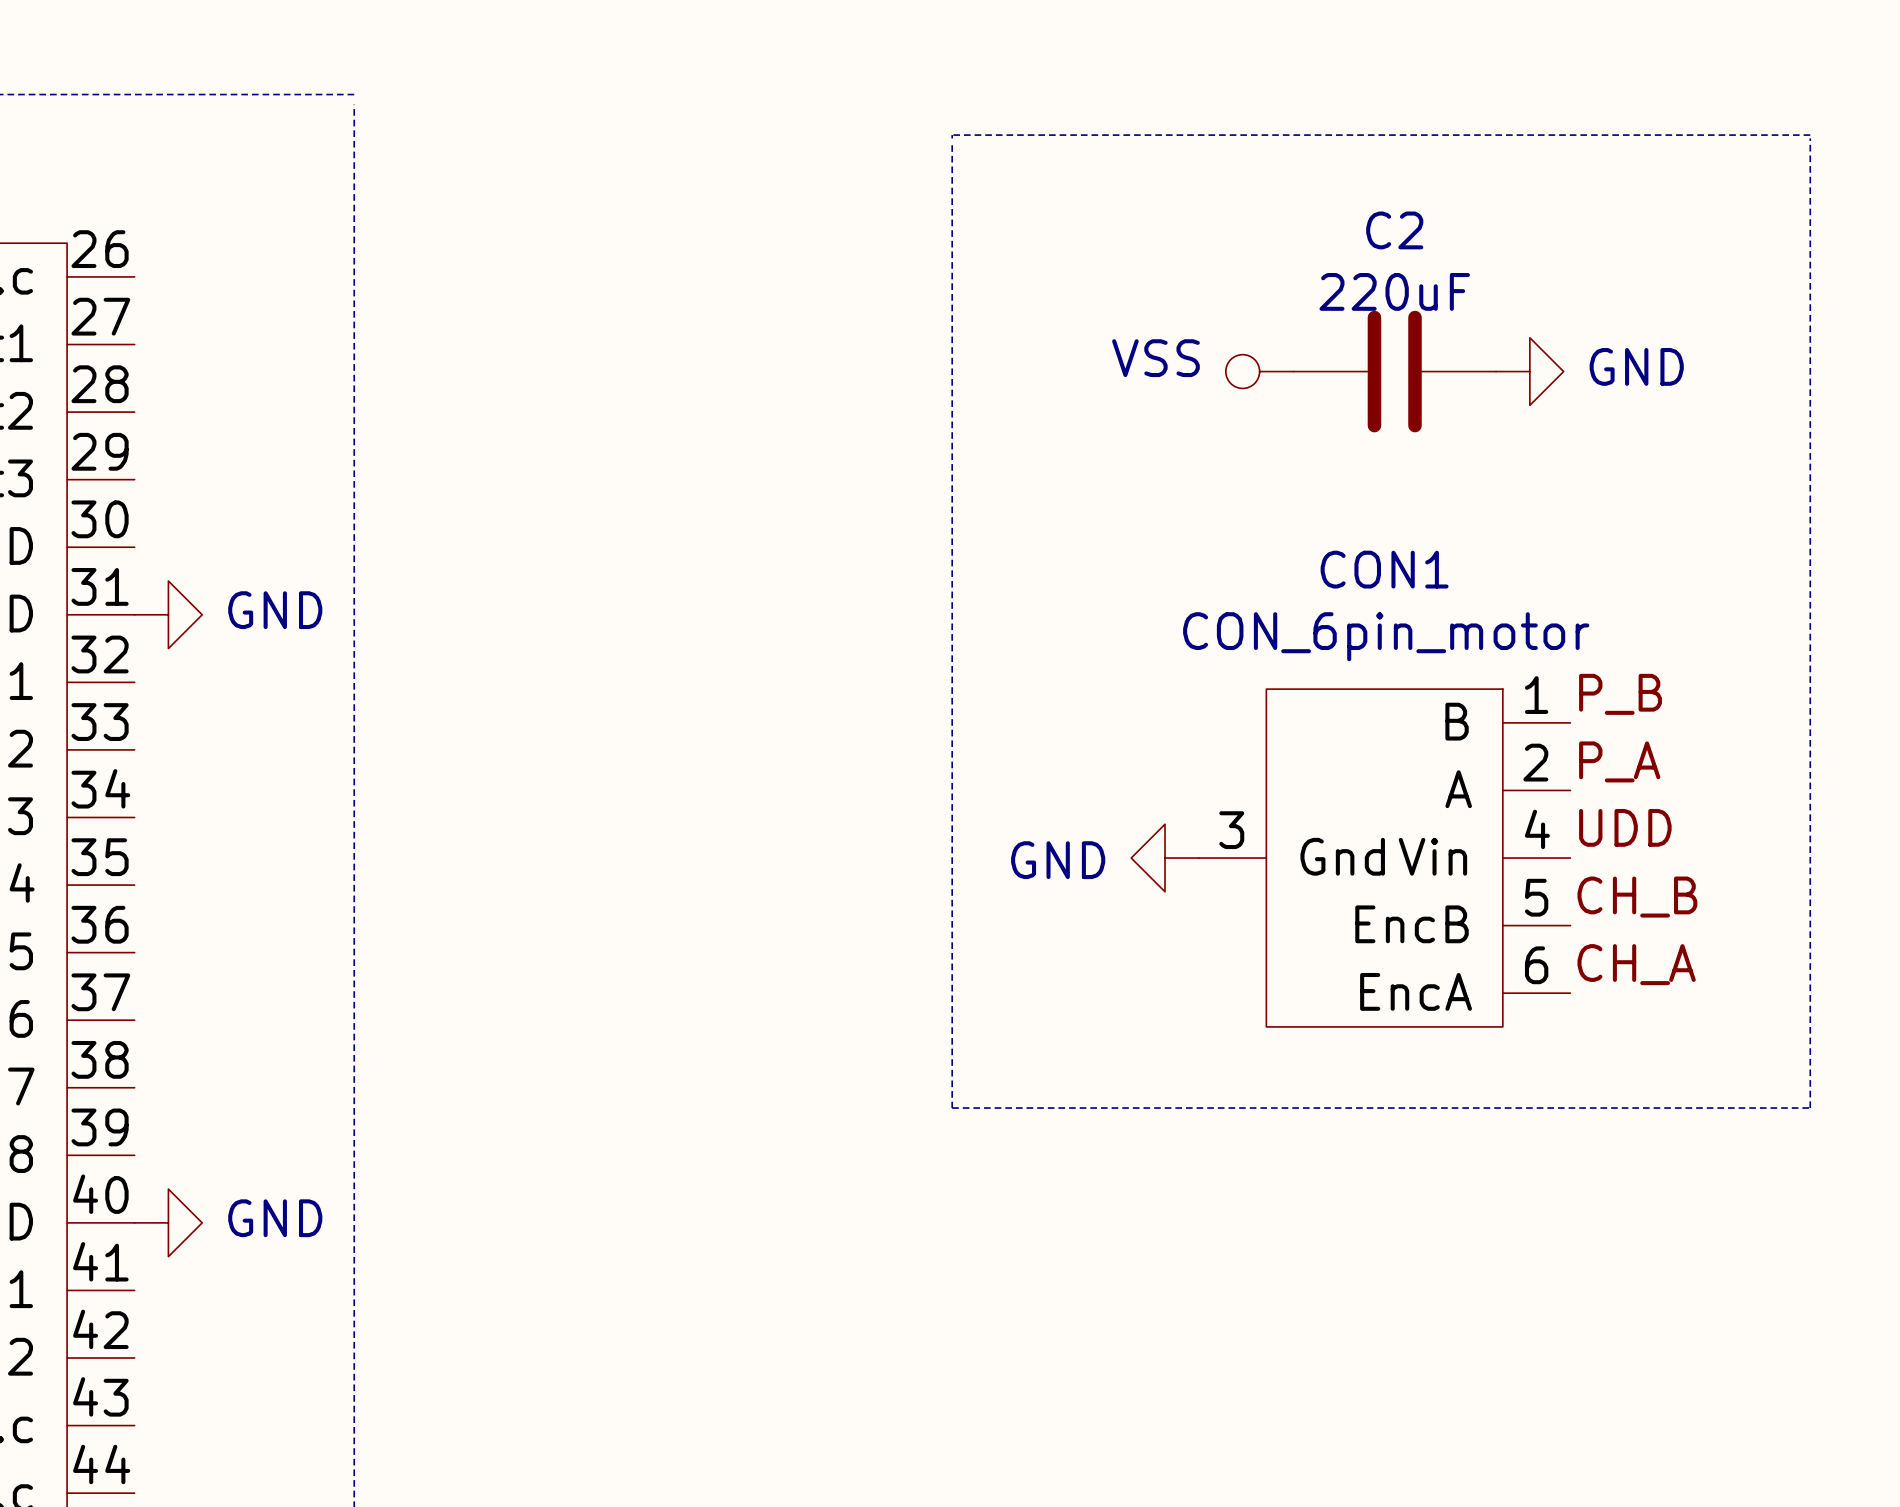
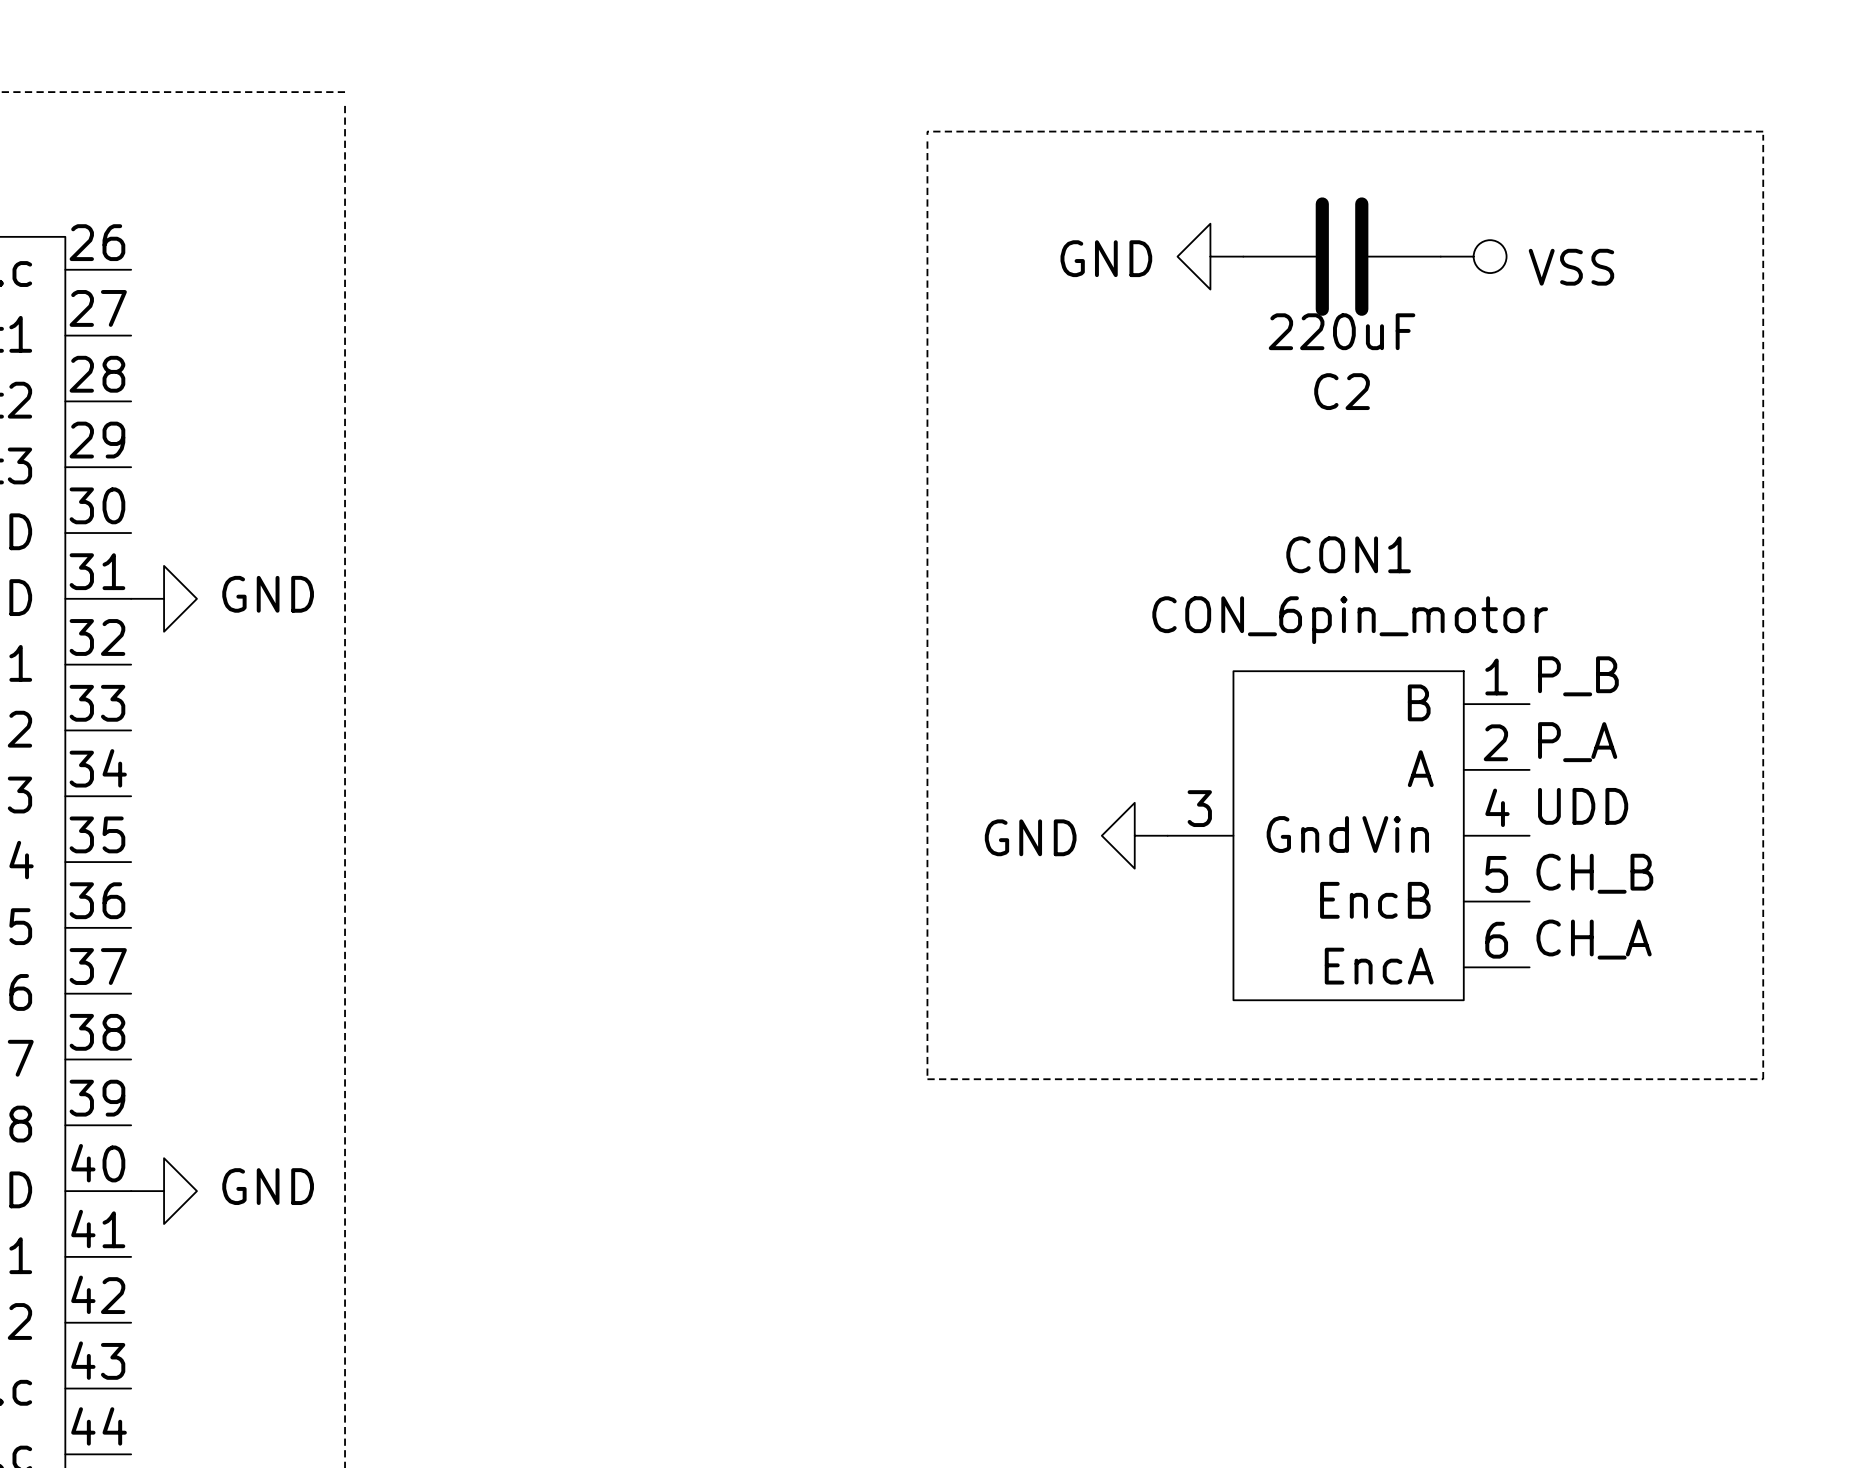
C2 name position: C2 (1394, 230) -> C2 (1342, 391)
C2 value position: 220uF (1394, 291) -> 220uF (1342, 331)
power symbol rotation: 0° (1259, 371) -> 180° (1473, 256)
power symbol position: VSS (1259, 371) -> VSS (1473, 256)
C2 position: (1394, 371) -> (1342, 256)
power symbol rotation: 0° (1529, 371) -> 180° (1210, 256)
power symbol position: GND (1529, 371) -> GND (1210, 256)

